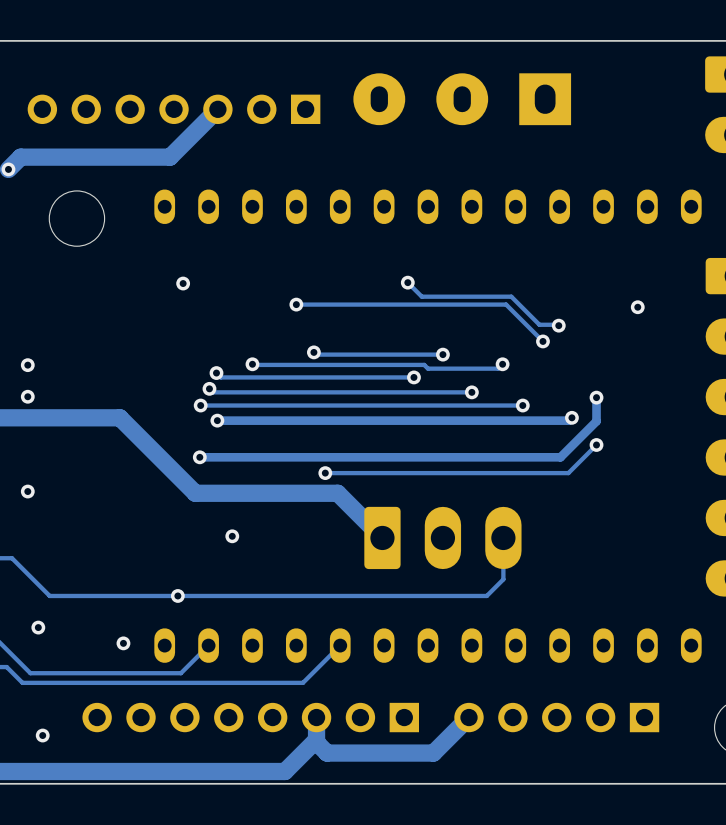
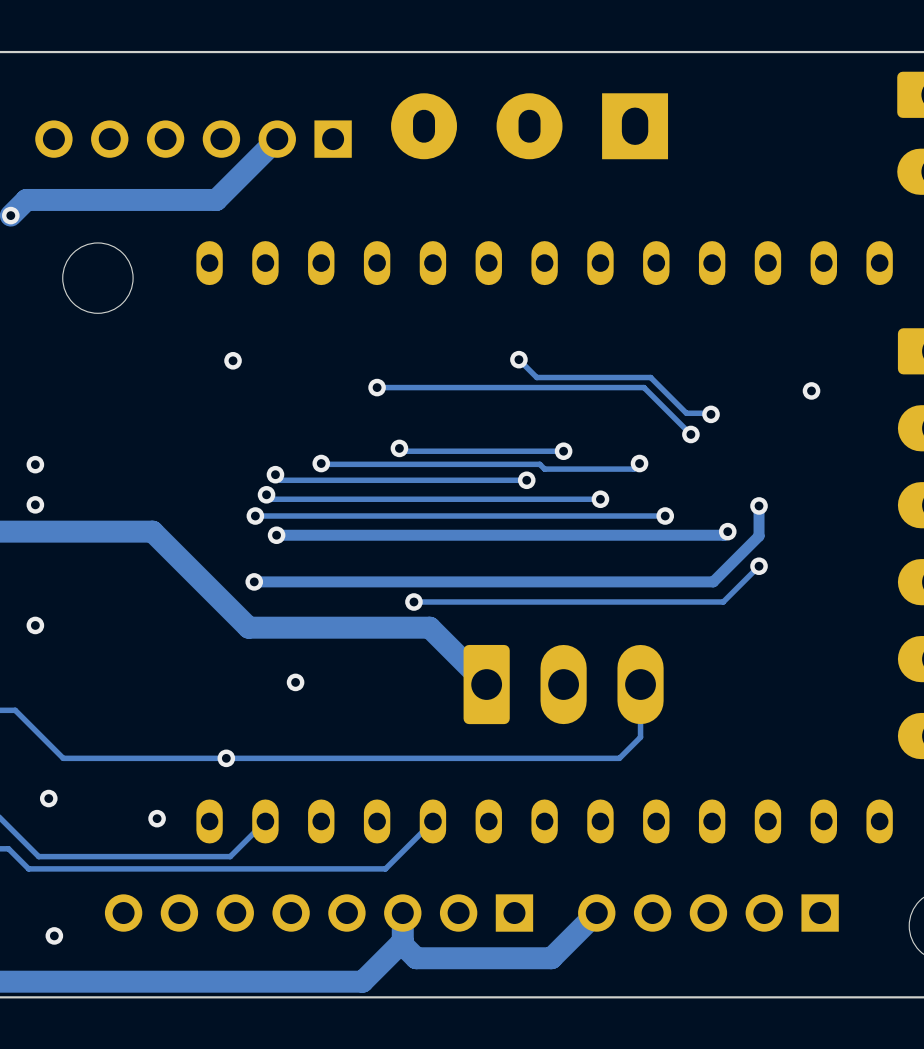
part position: (462, 99) -> (529, 126)
part: none -> (193, 139)
part: (174, 109) -> none

